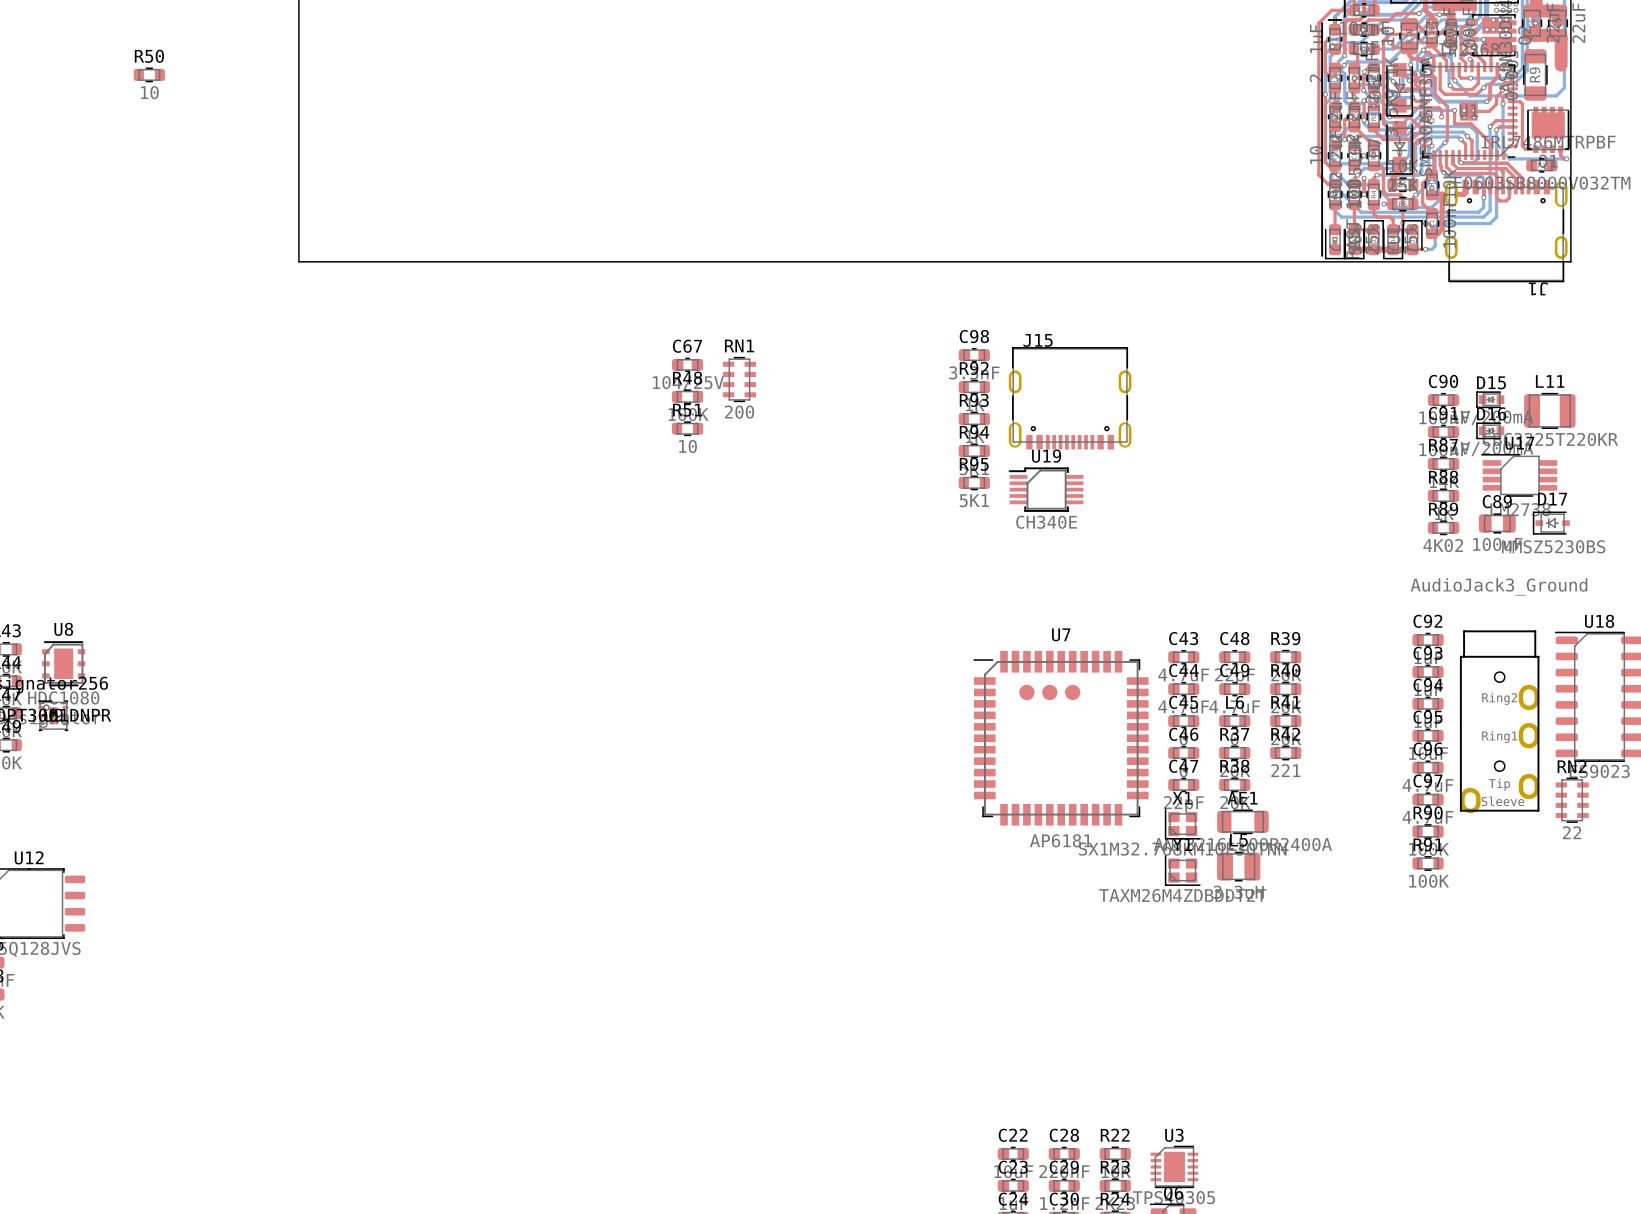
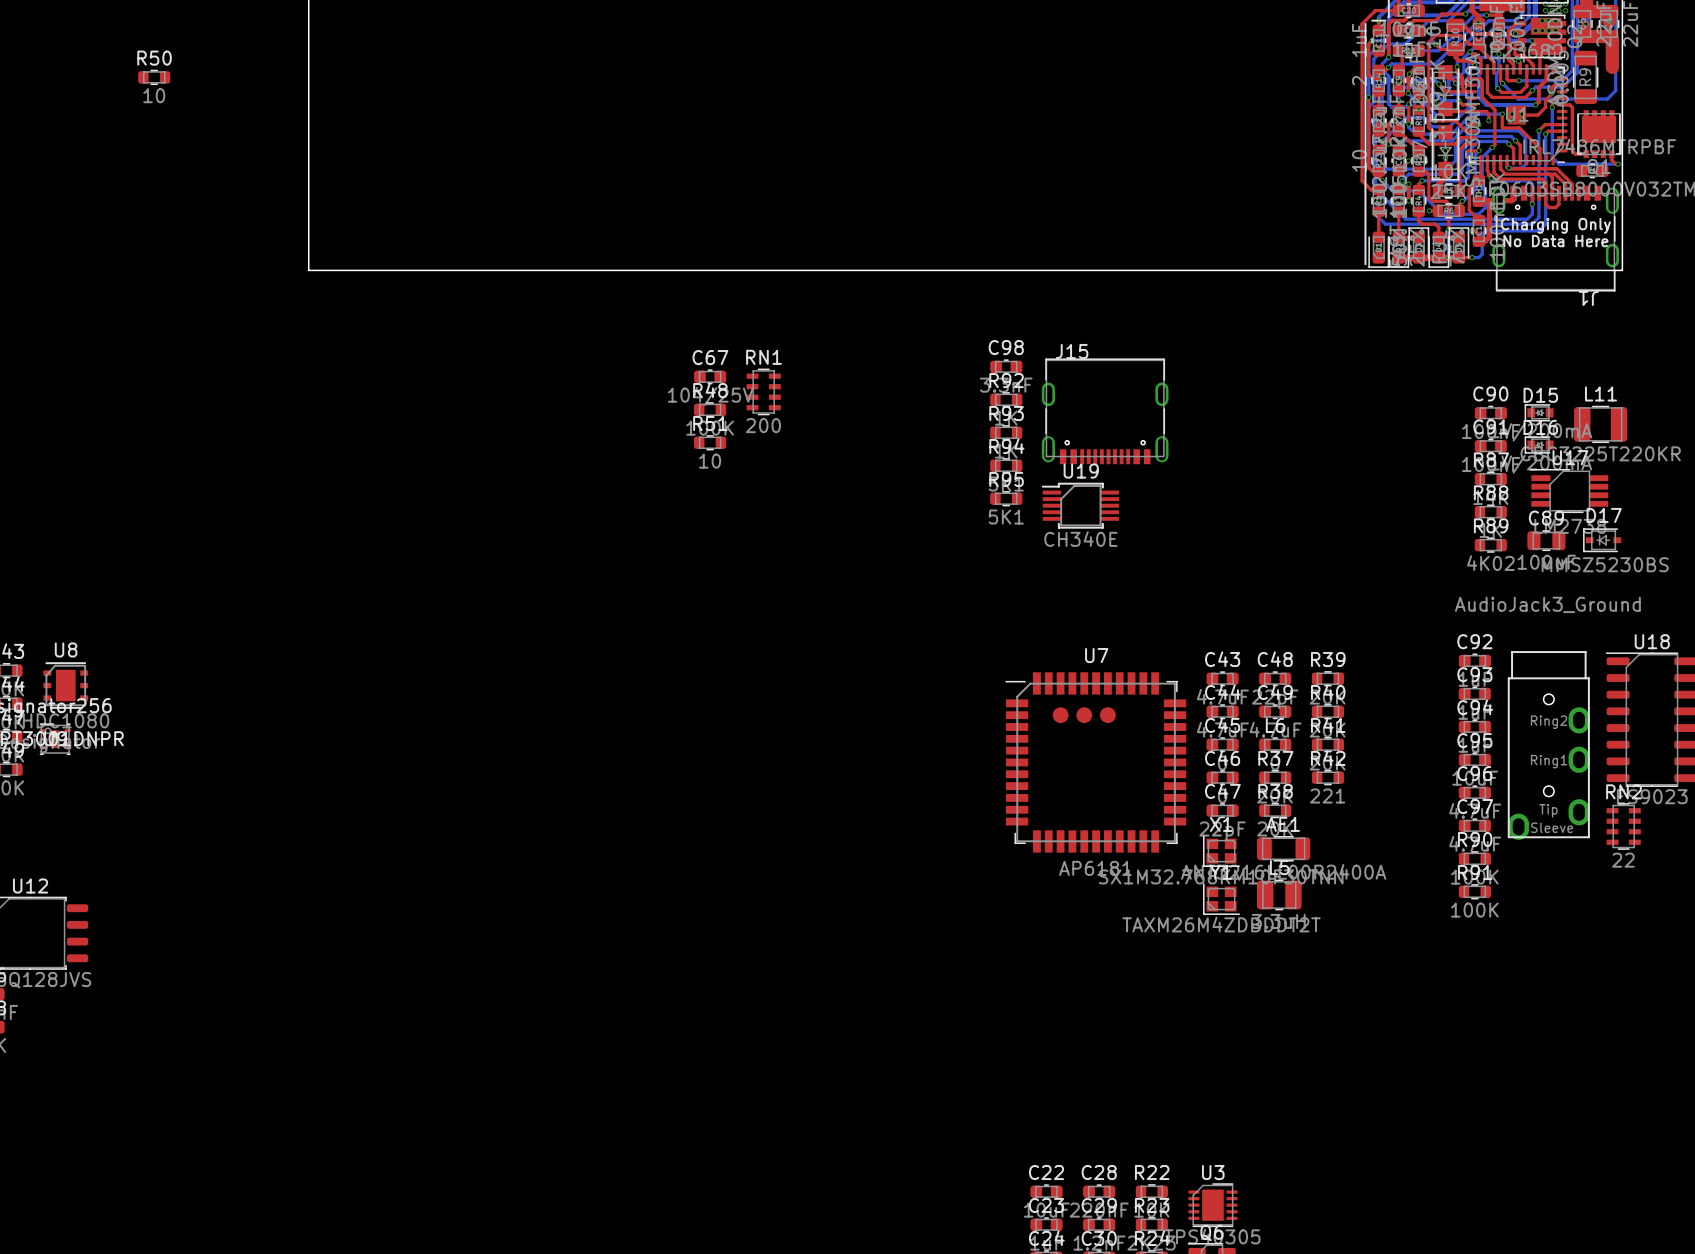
text: none -> Charging Only (1555, 225)
text: none -> No Data Here (1555, 241)

